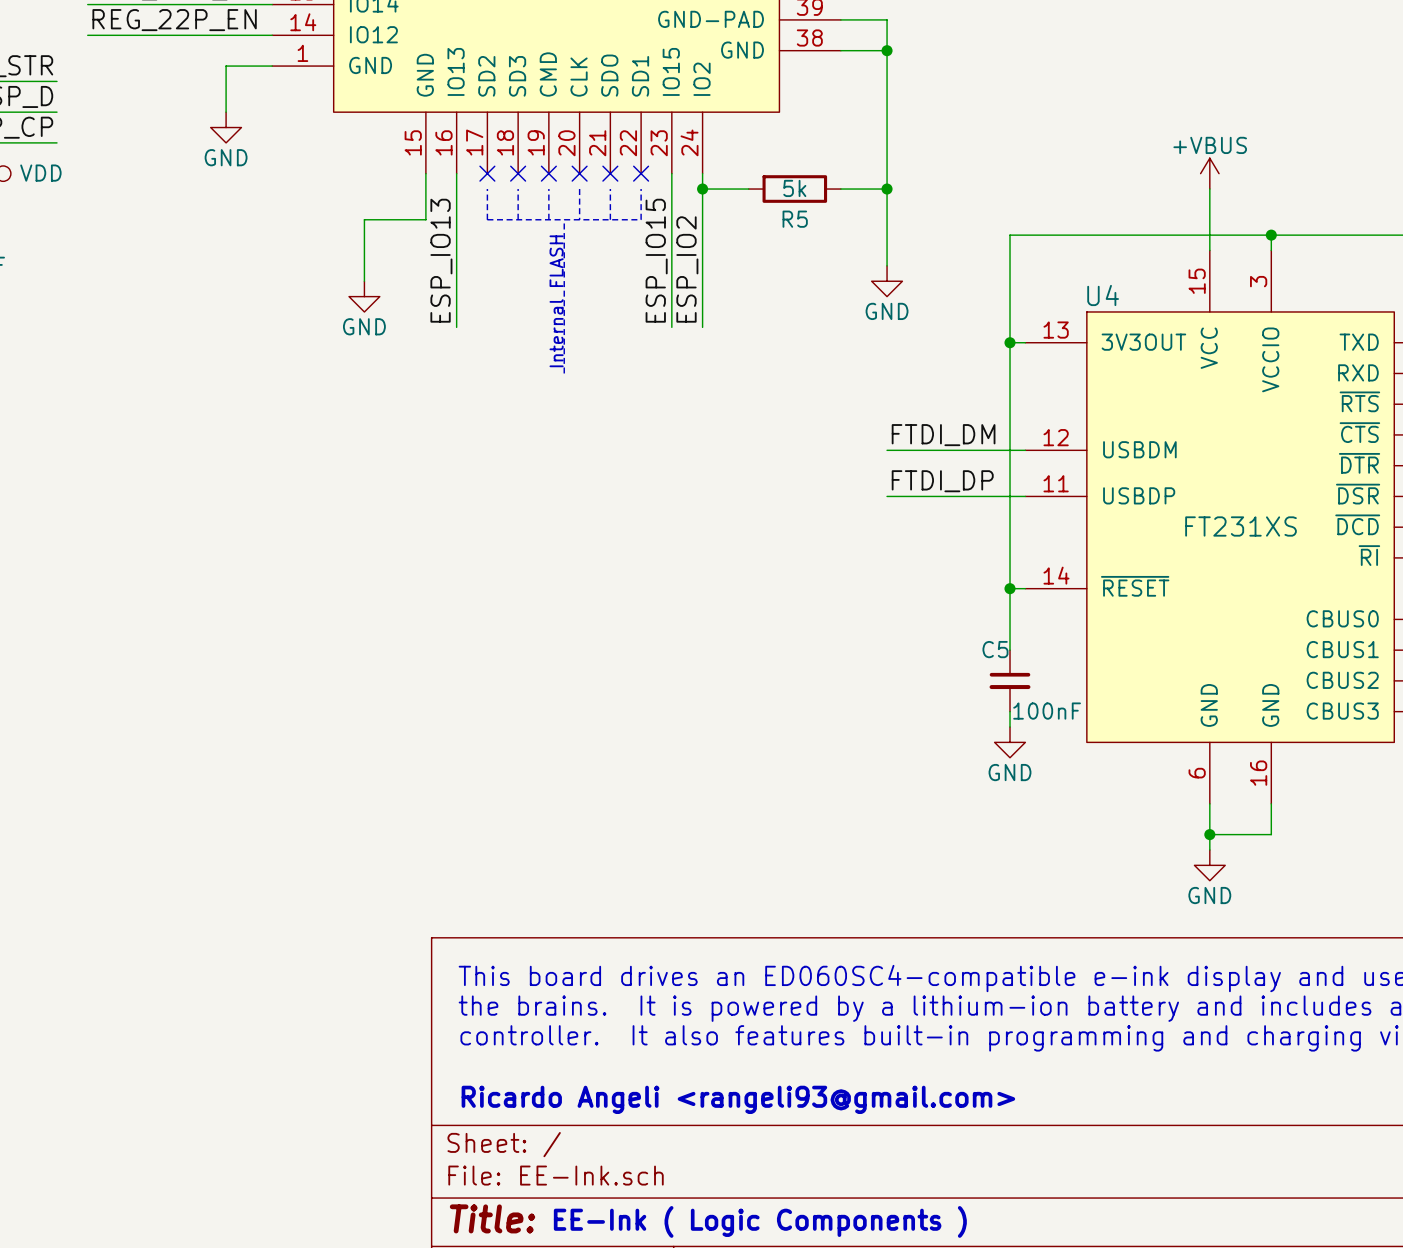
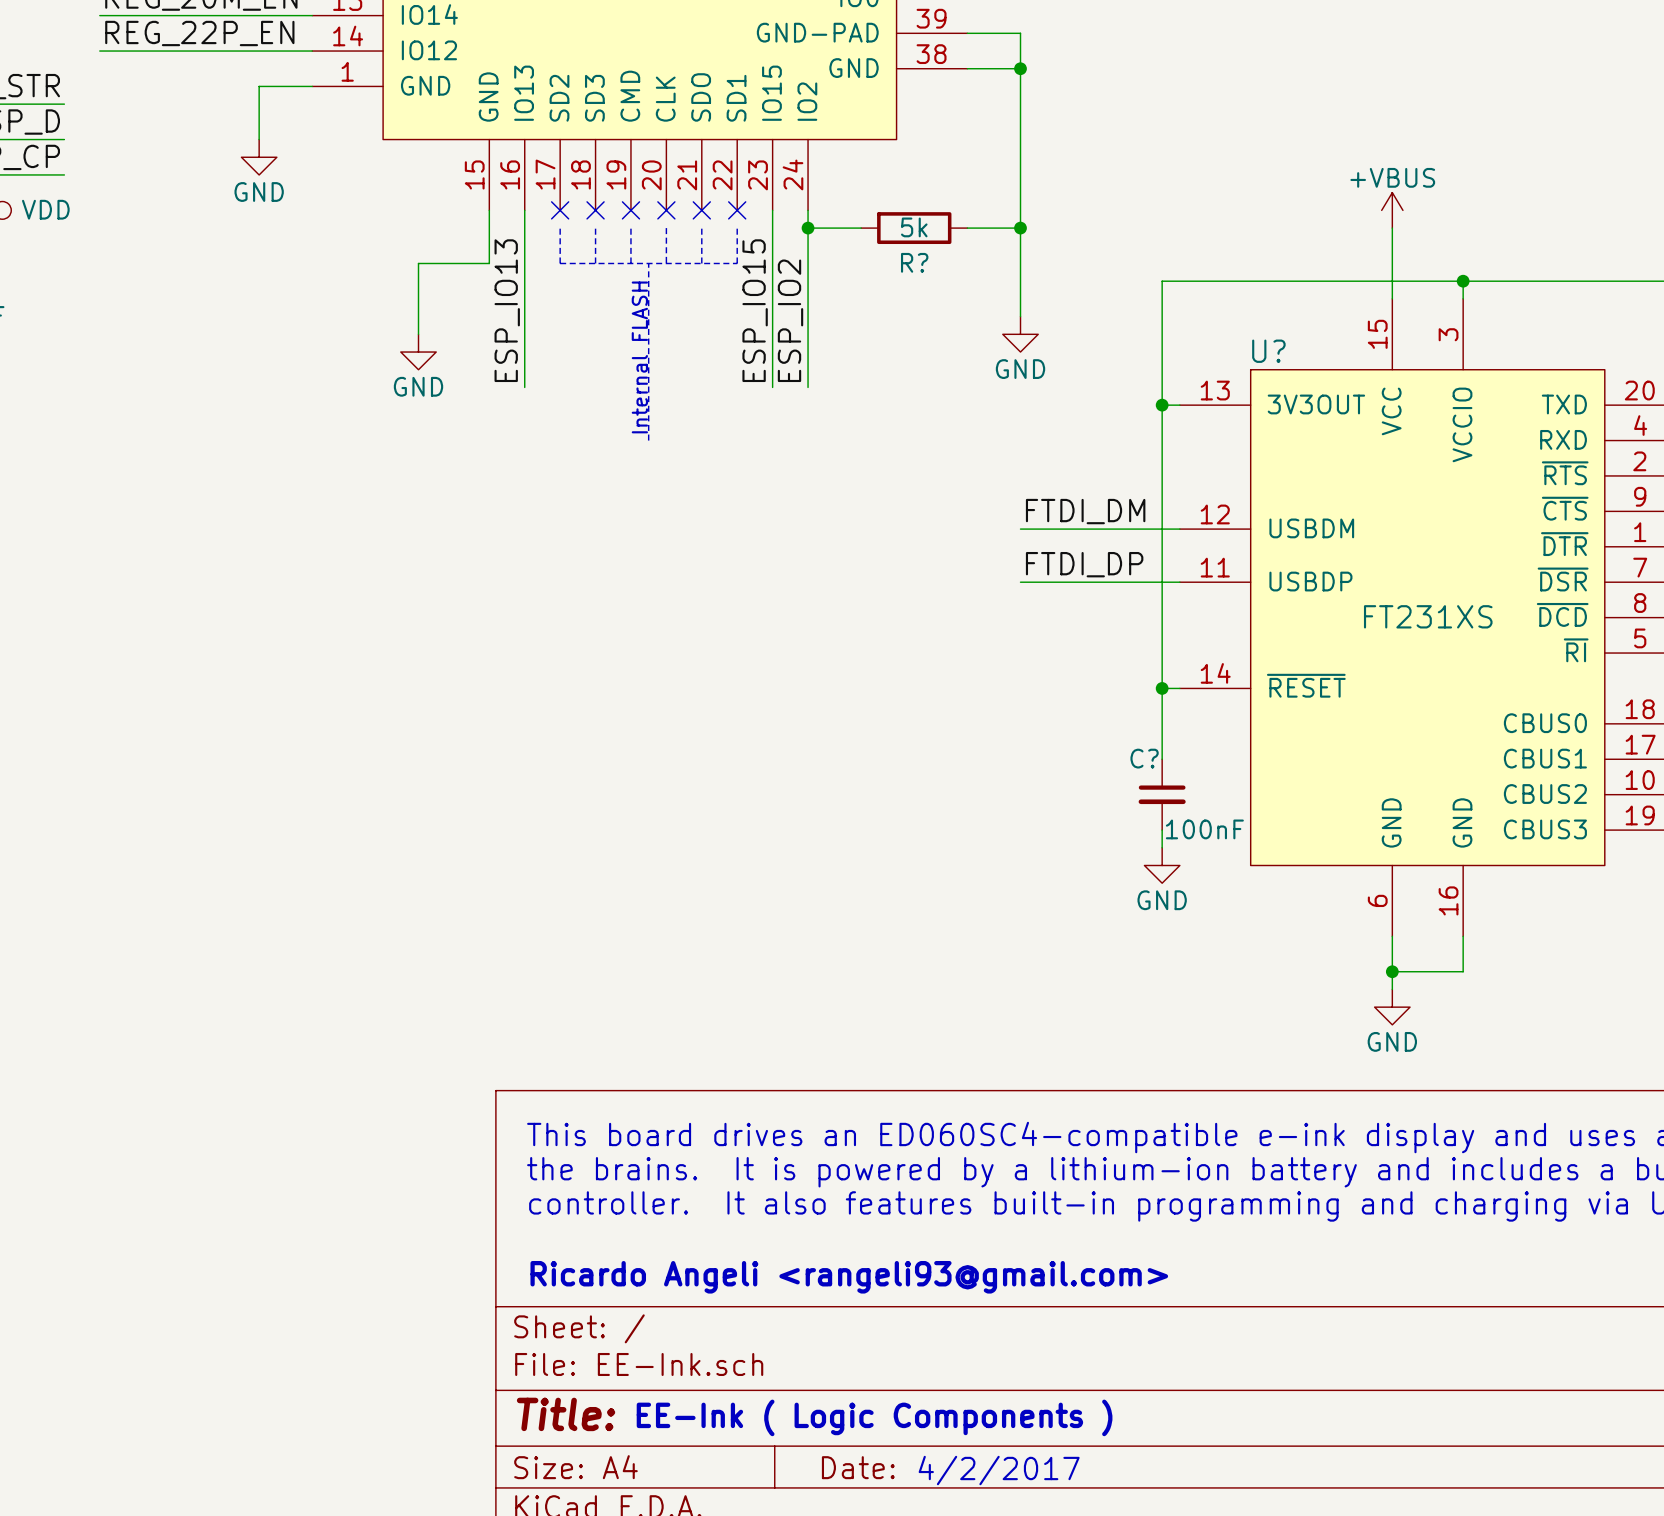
R5 name: R5 (795, 219) -> R? (914, 262)
U4 name: U4 (1103, 295) -> U? (1268, 351)
C5 name: C5 (995, 649) -> C? (1144, 758)

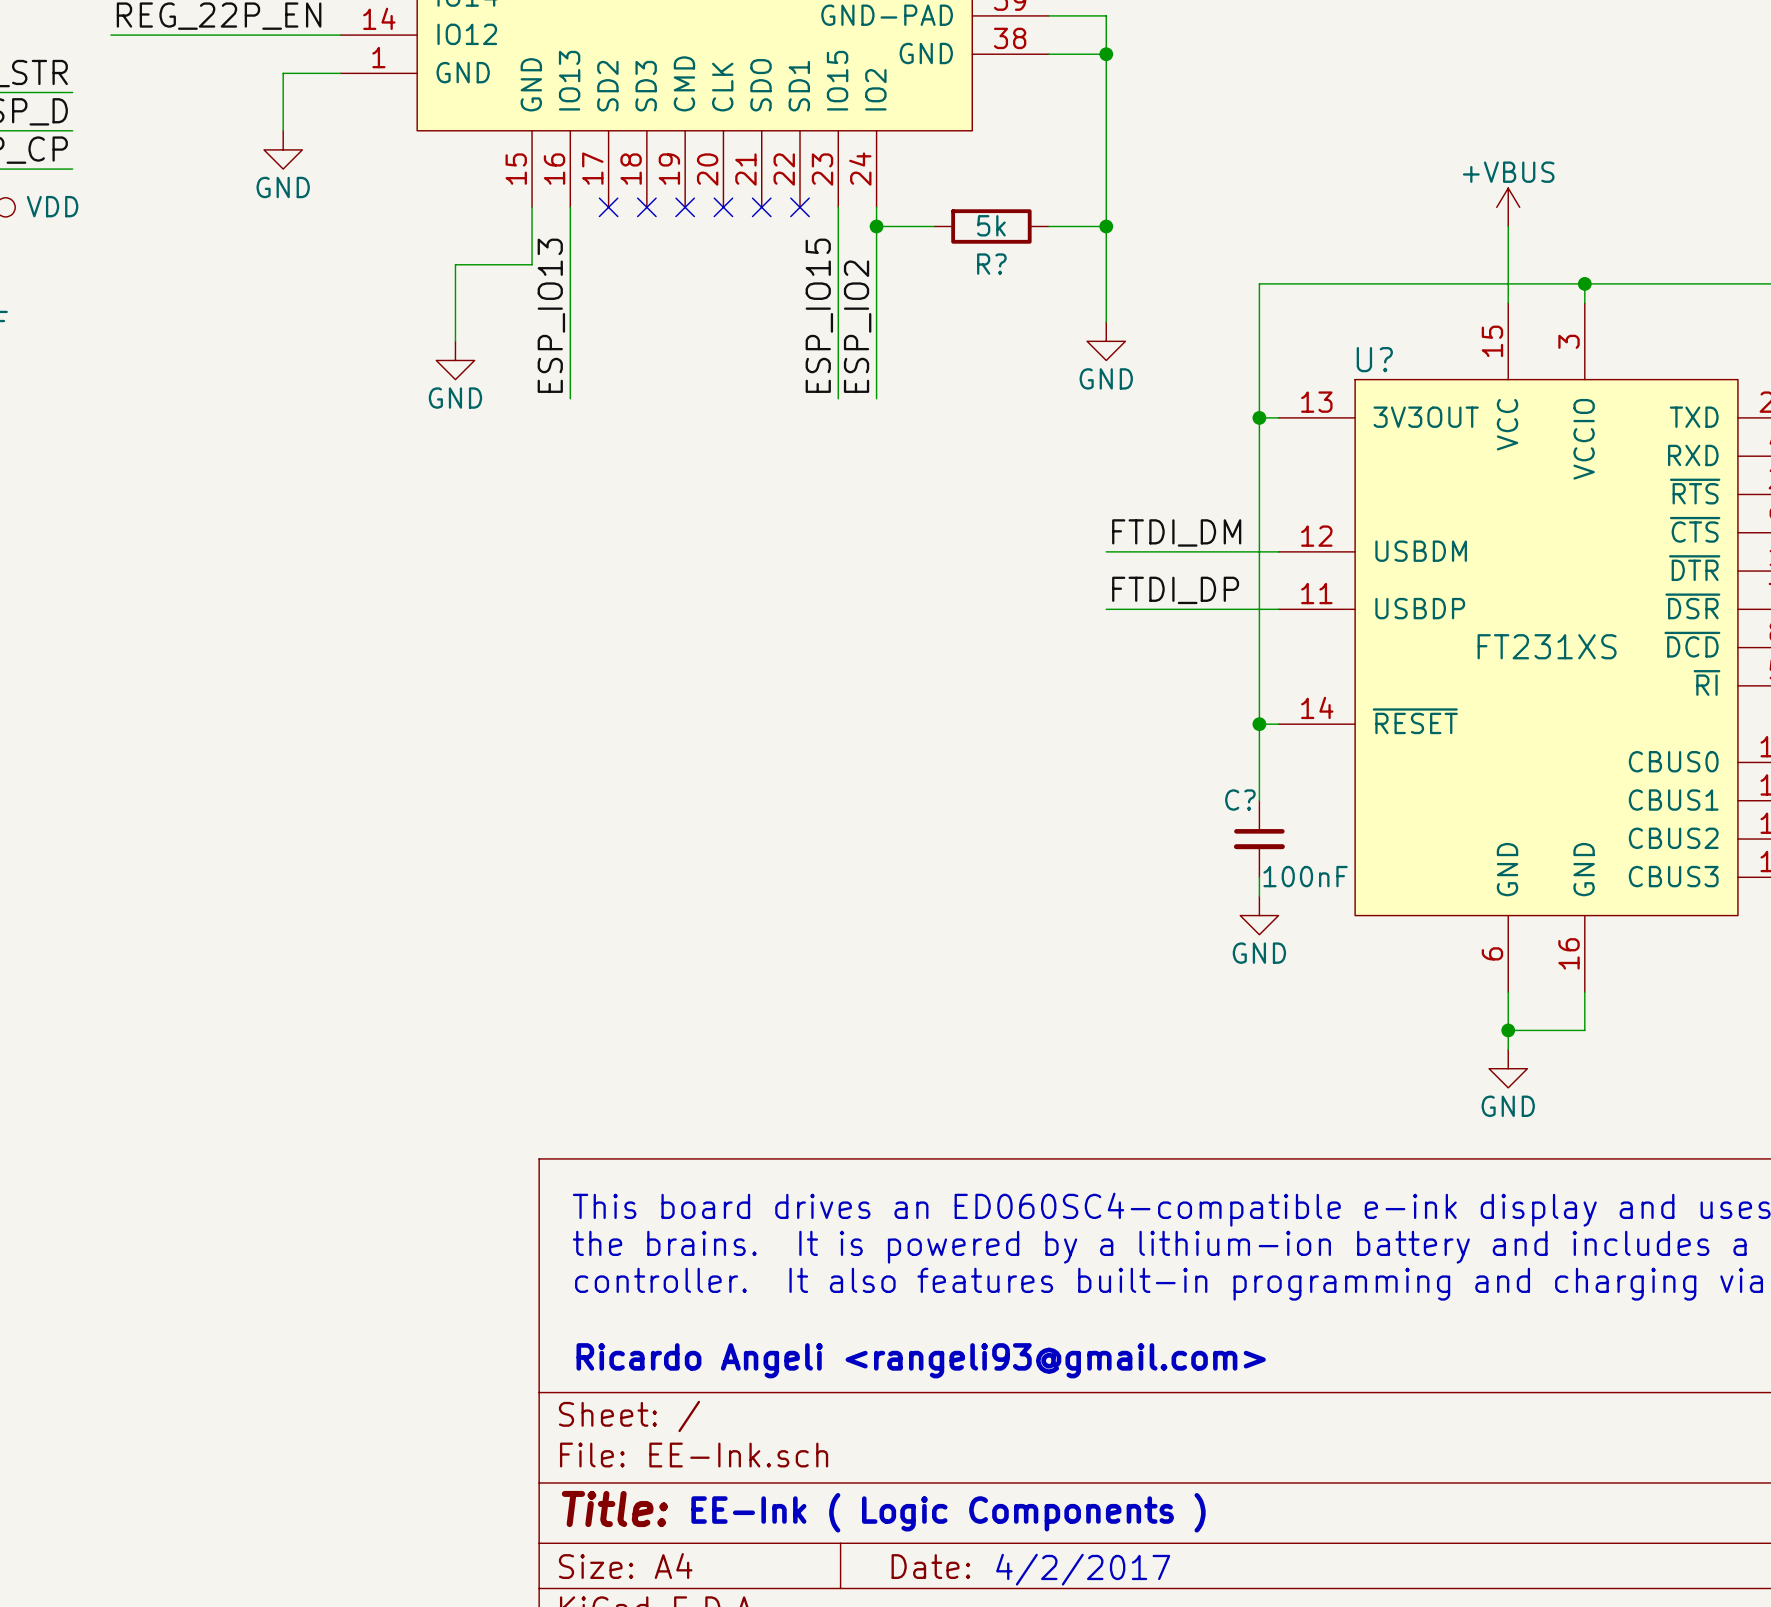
line: (560, 228) (560, 263) (737, 263) (737, 228) -> none
line: (595, 228) (595, 263) -> none
line: (630, 228) (630, 263) -> none
line: (666, 228) (666, 263) -> none
line: (701, 228) (701, 263) -> none
line: (648, 263) (648, 440) -> none
text: Internal FLASH (639, 357) -> none

